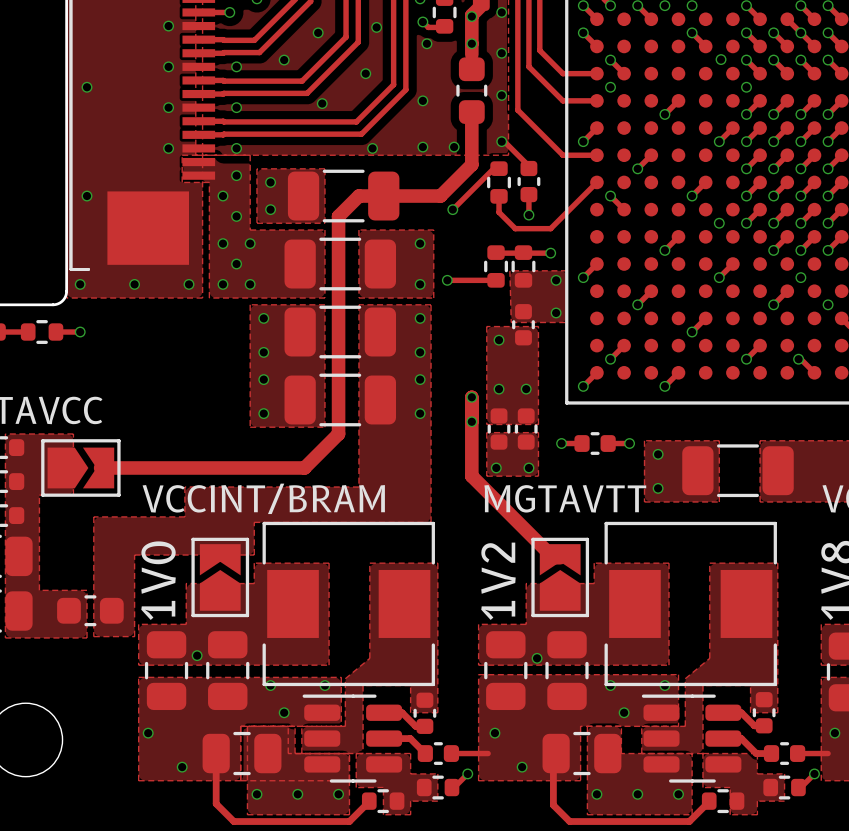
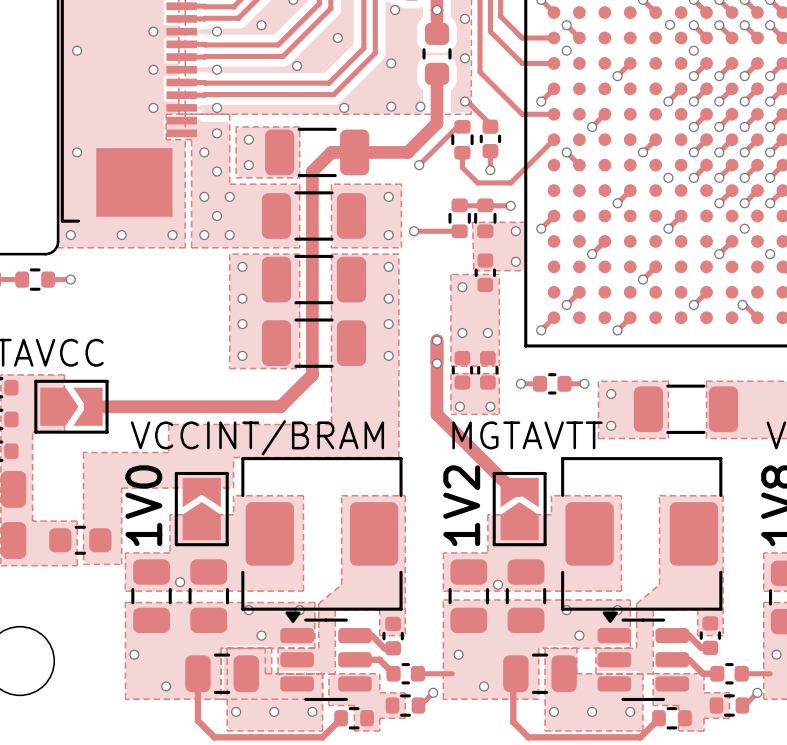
part footprint: [262, 521, 435, 687] -> [241, 457, 403, 611]
part footprint: [604, 521, 777, 687] -> [561, 457, 723, 611]
part footprint: [302, 694, 403, 783] -> [280, 611, 372, 701]
part footprint: [641, 694, 742, 783] -> [597, 611, 690, 701]

